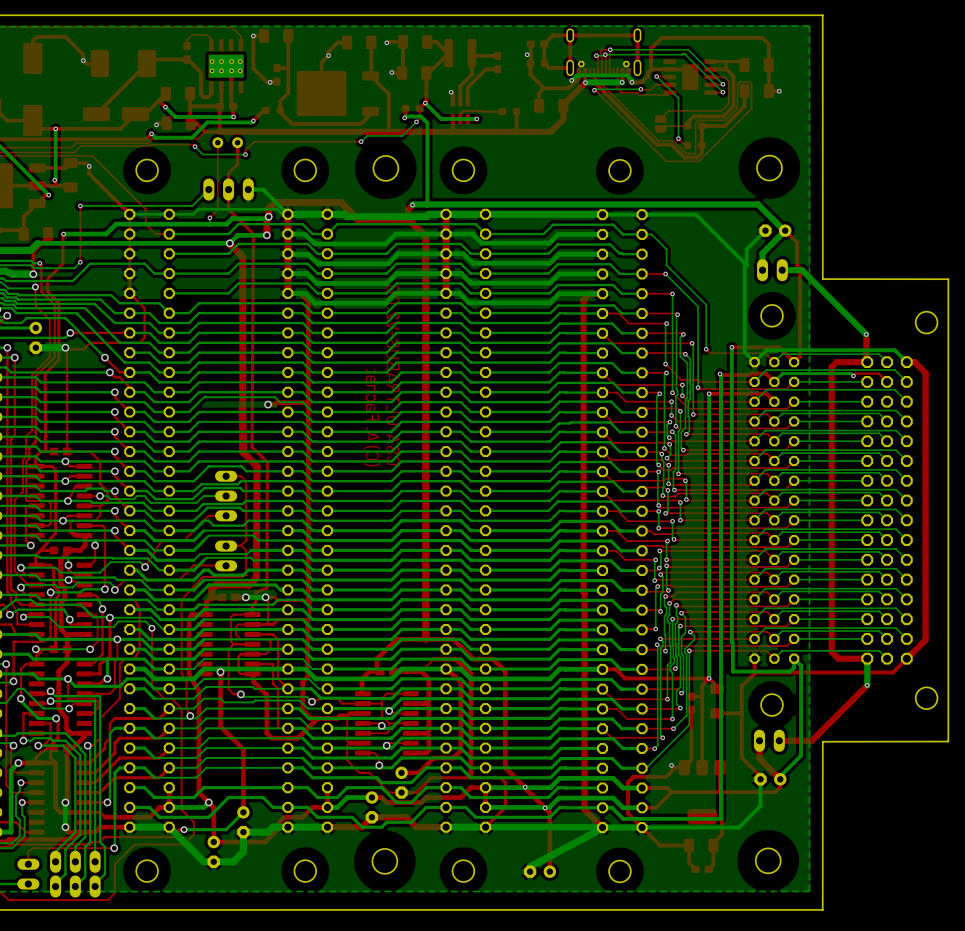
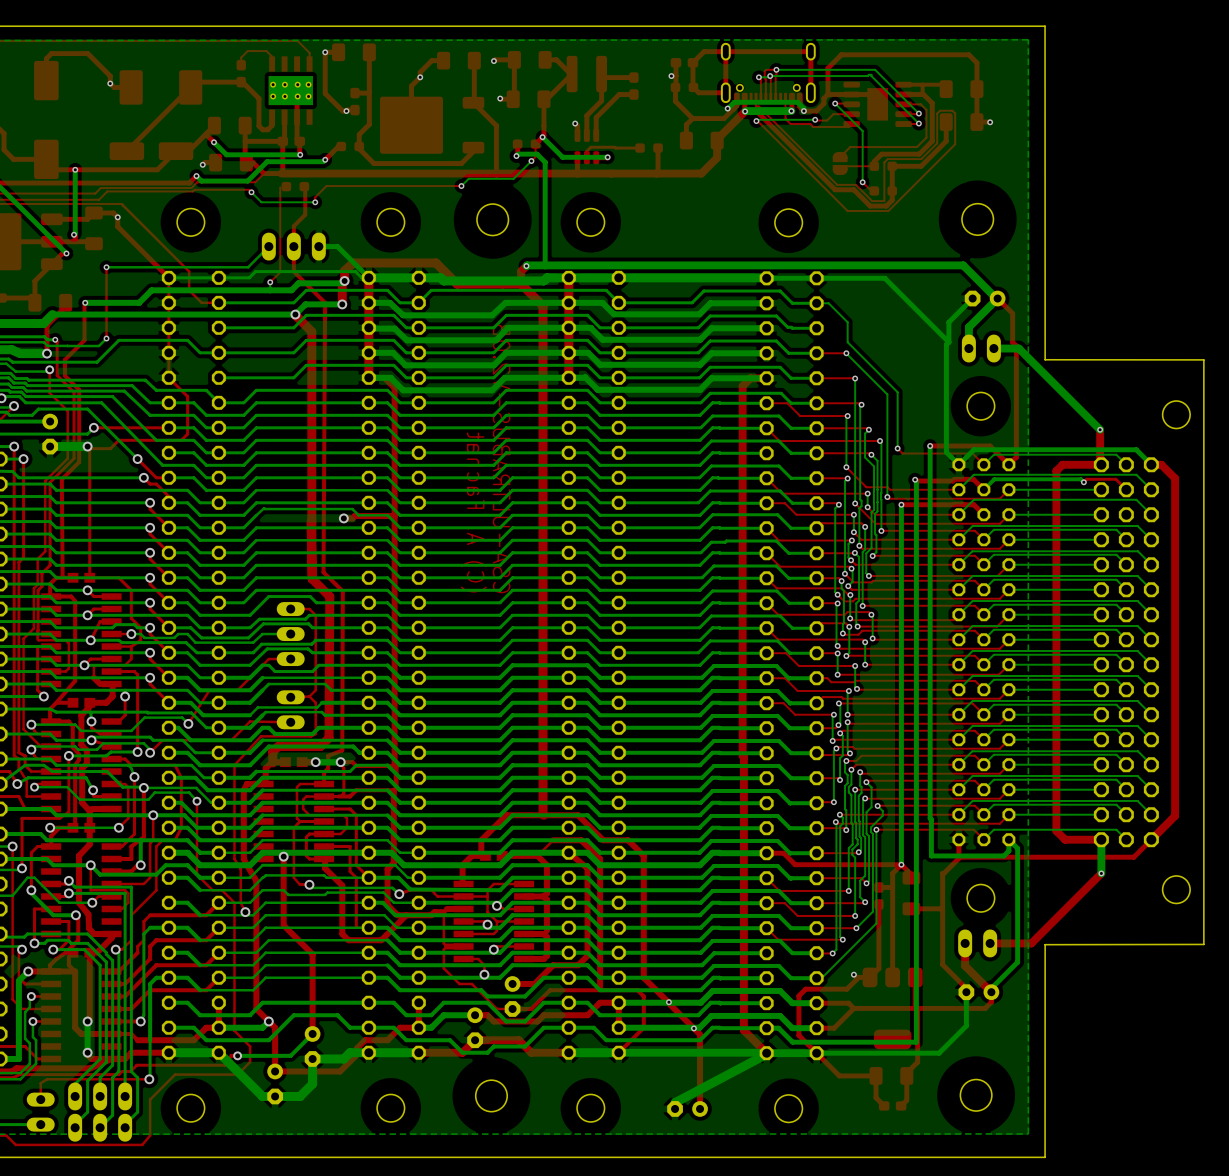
part footprint: [212, 137, 244, 149] -> [281, 181, 310, 192]

